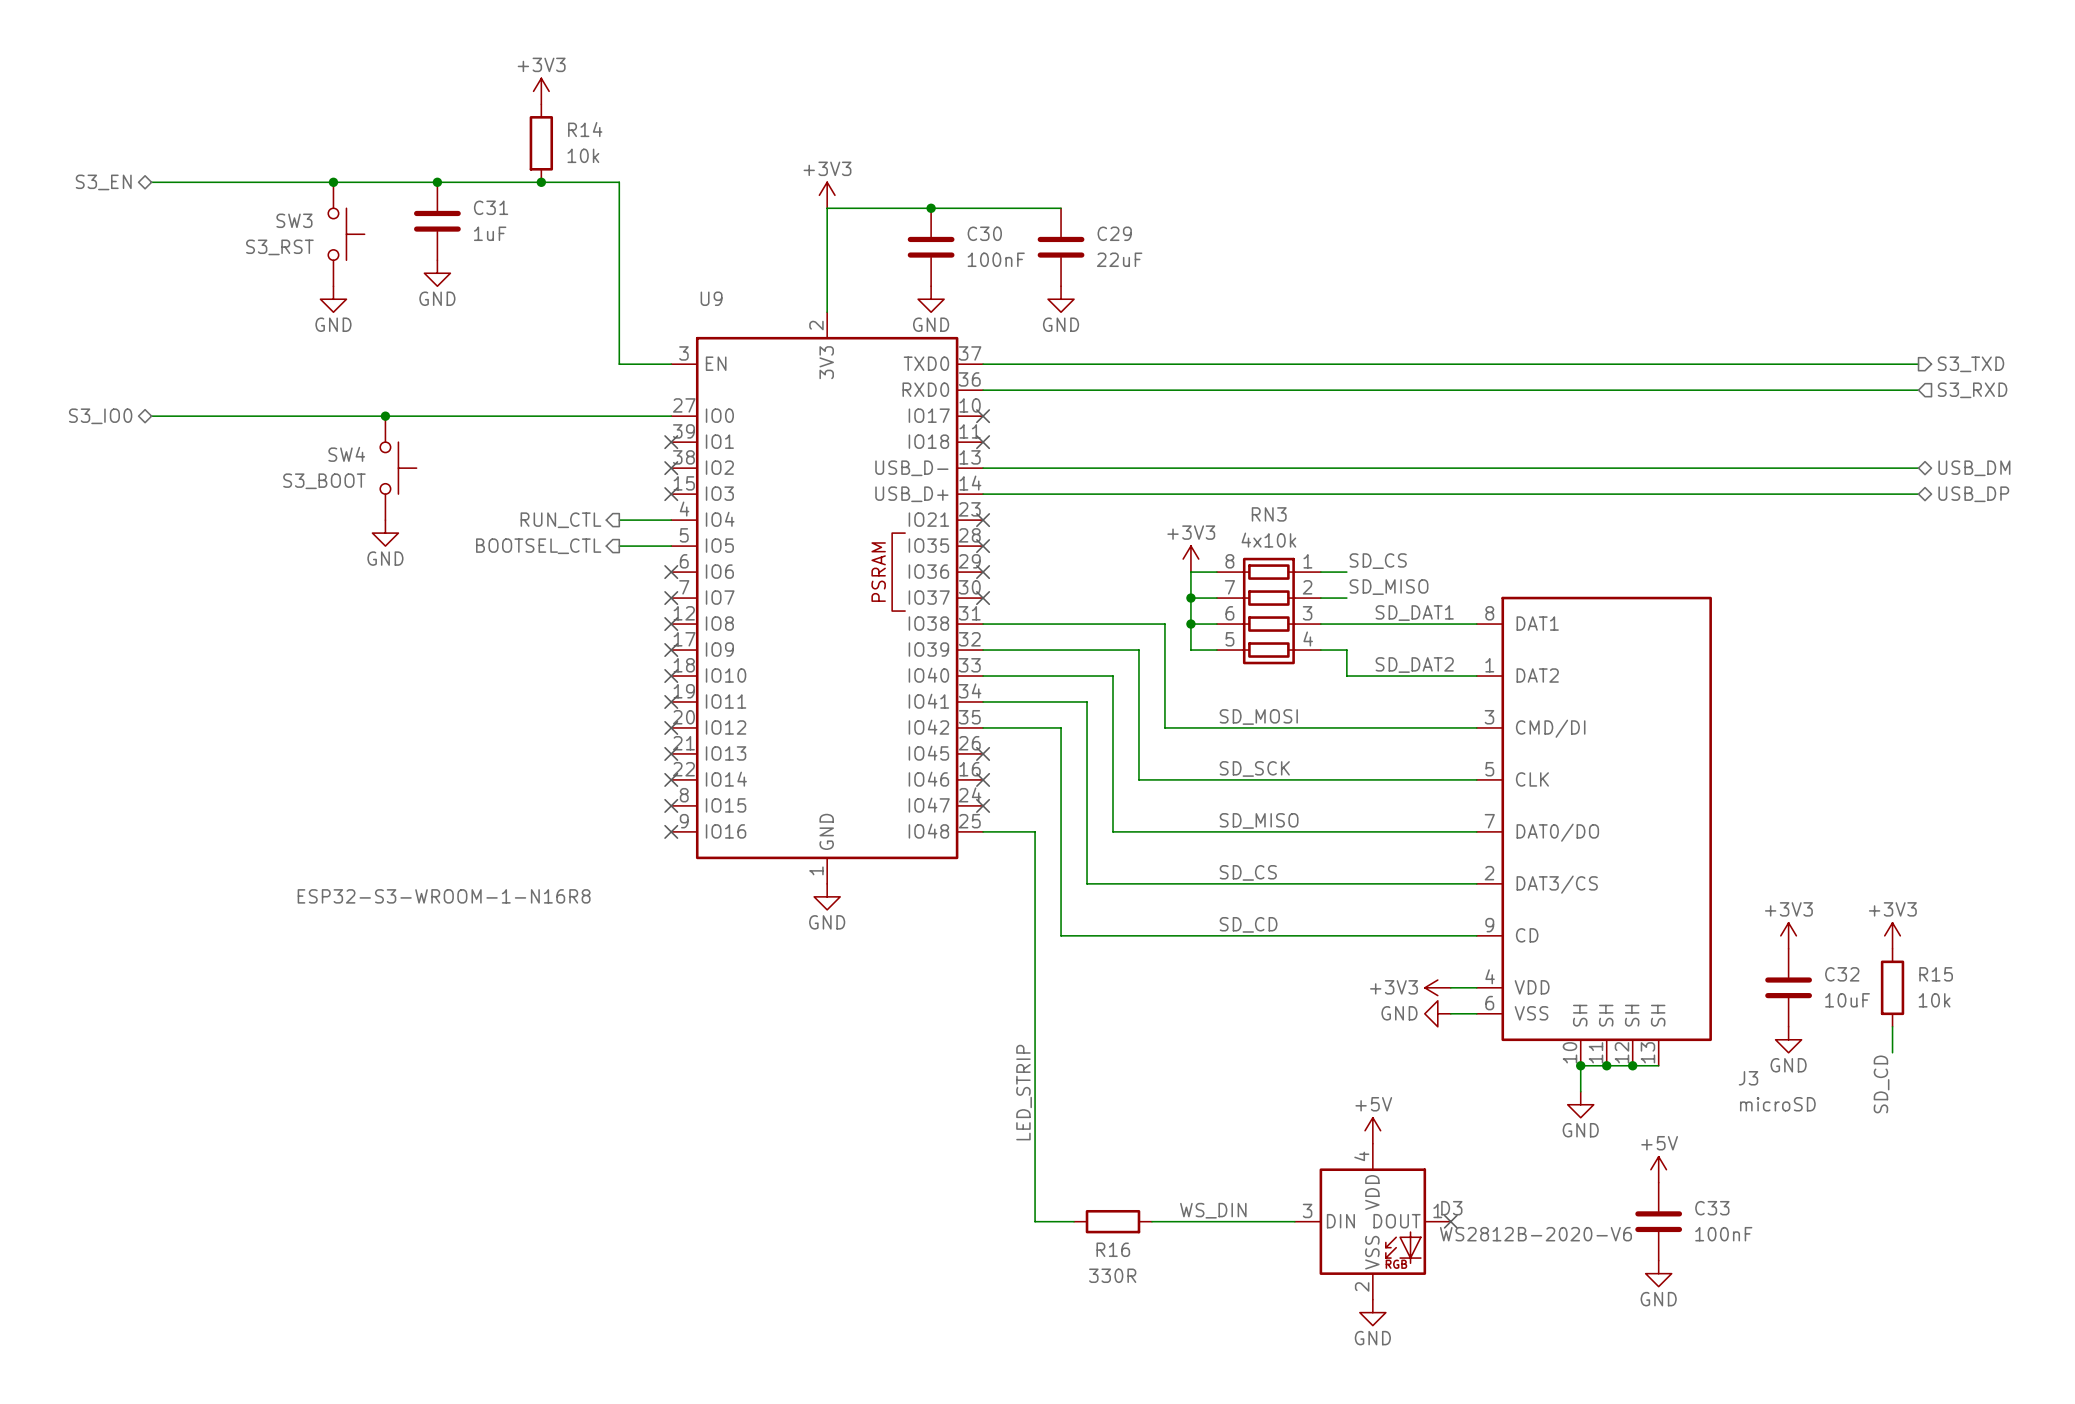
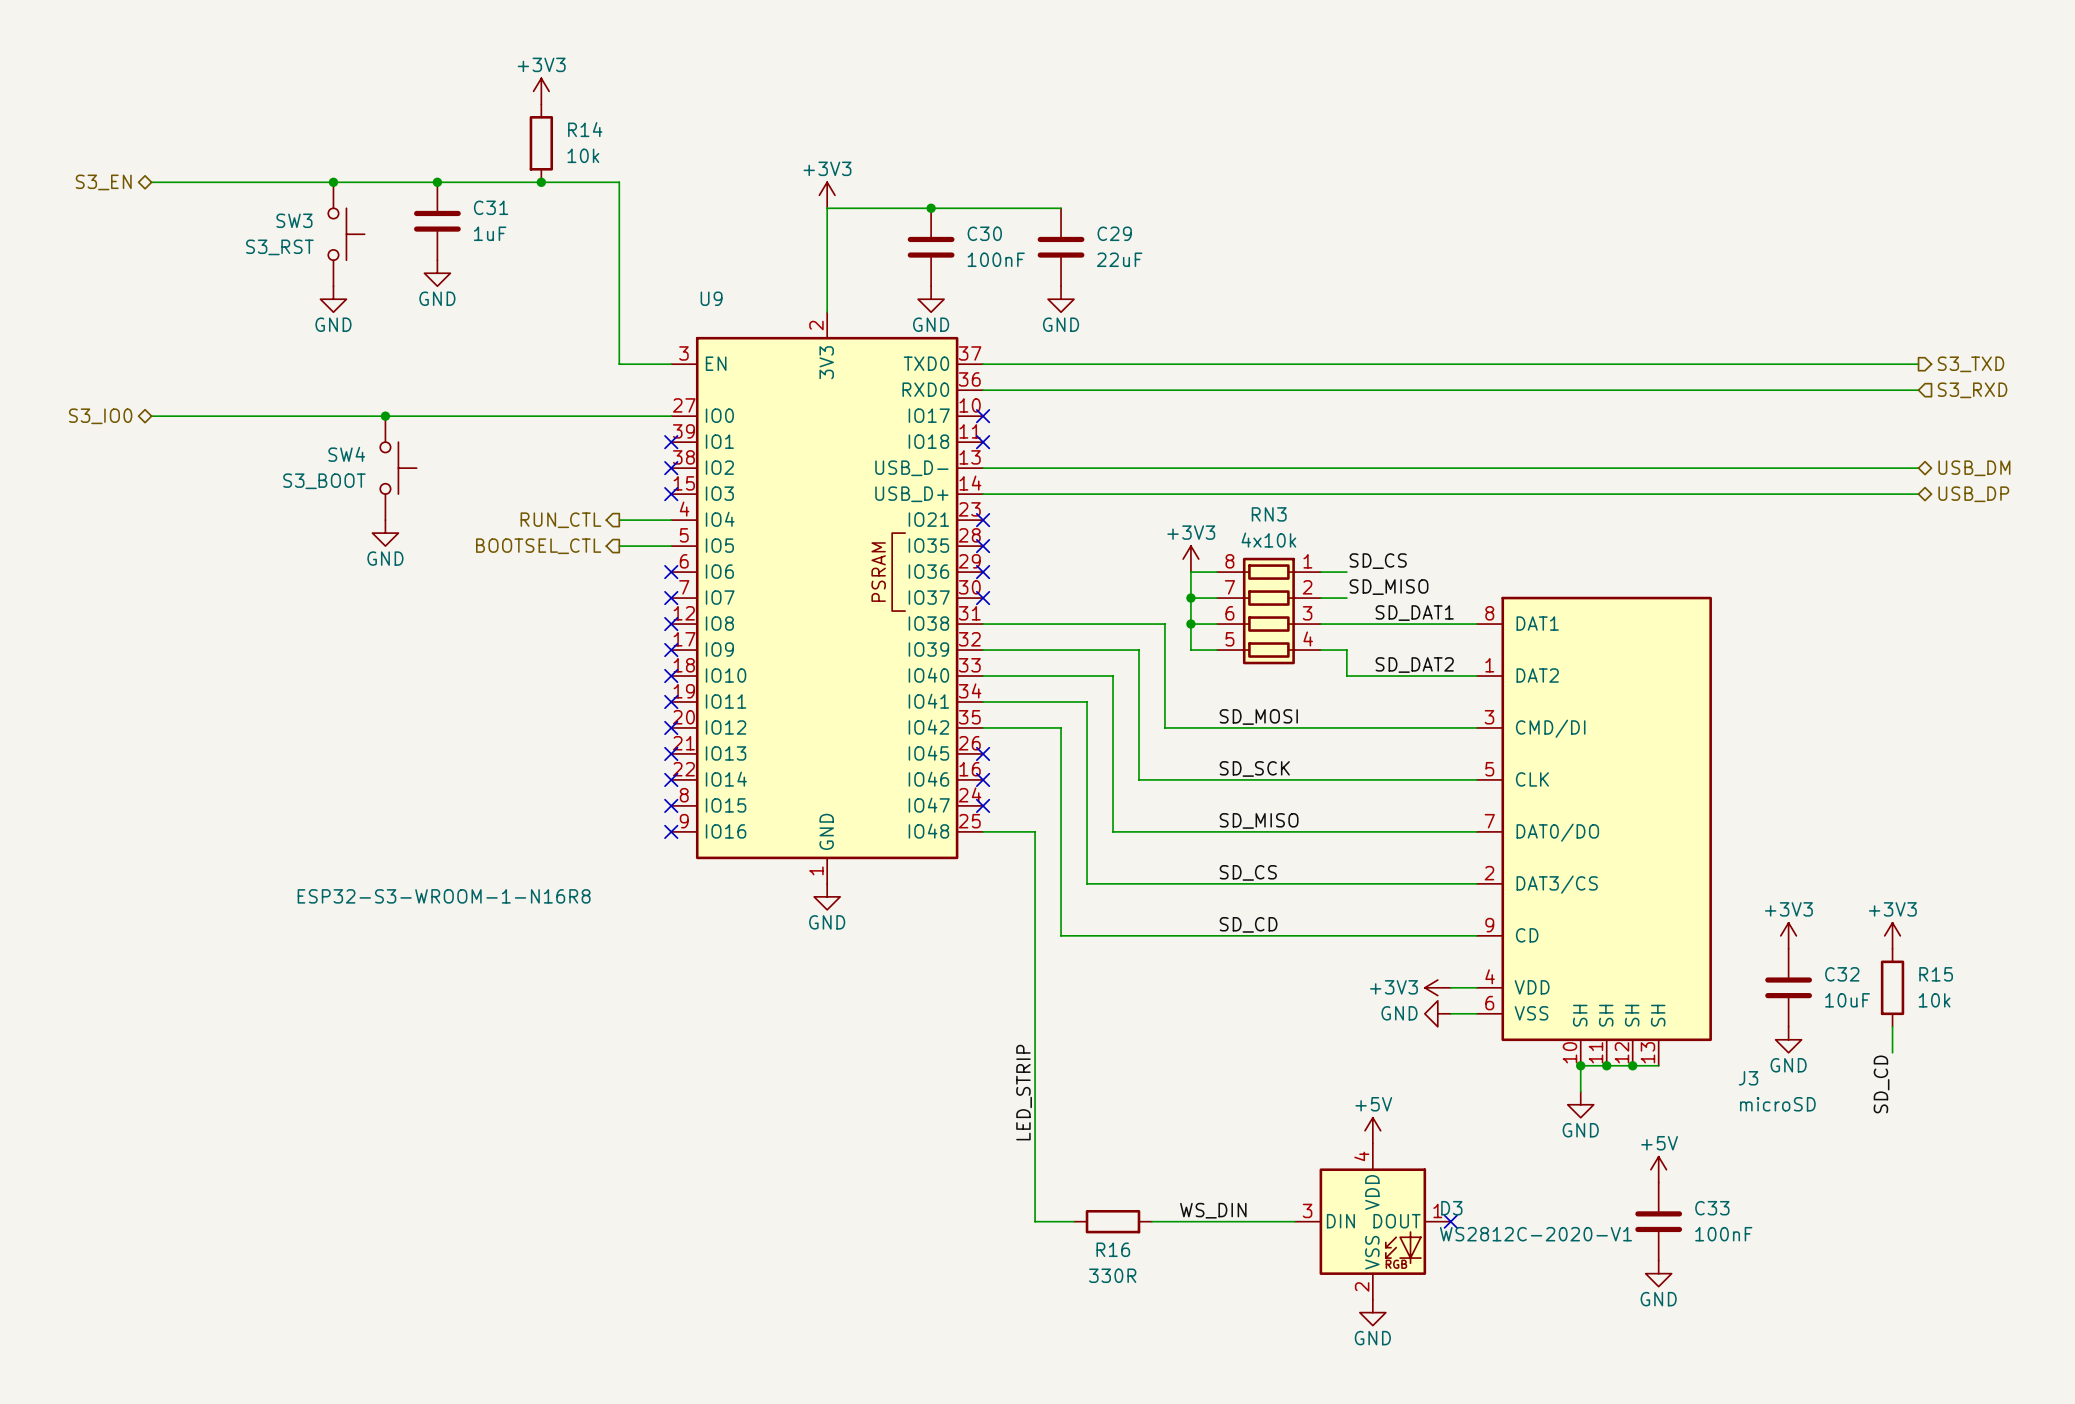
D3 value: WS2812B-2020-V6 (1535, 1234) -> WS2812C-2020-V1 (1535, 1234)

